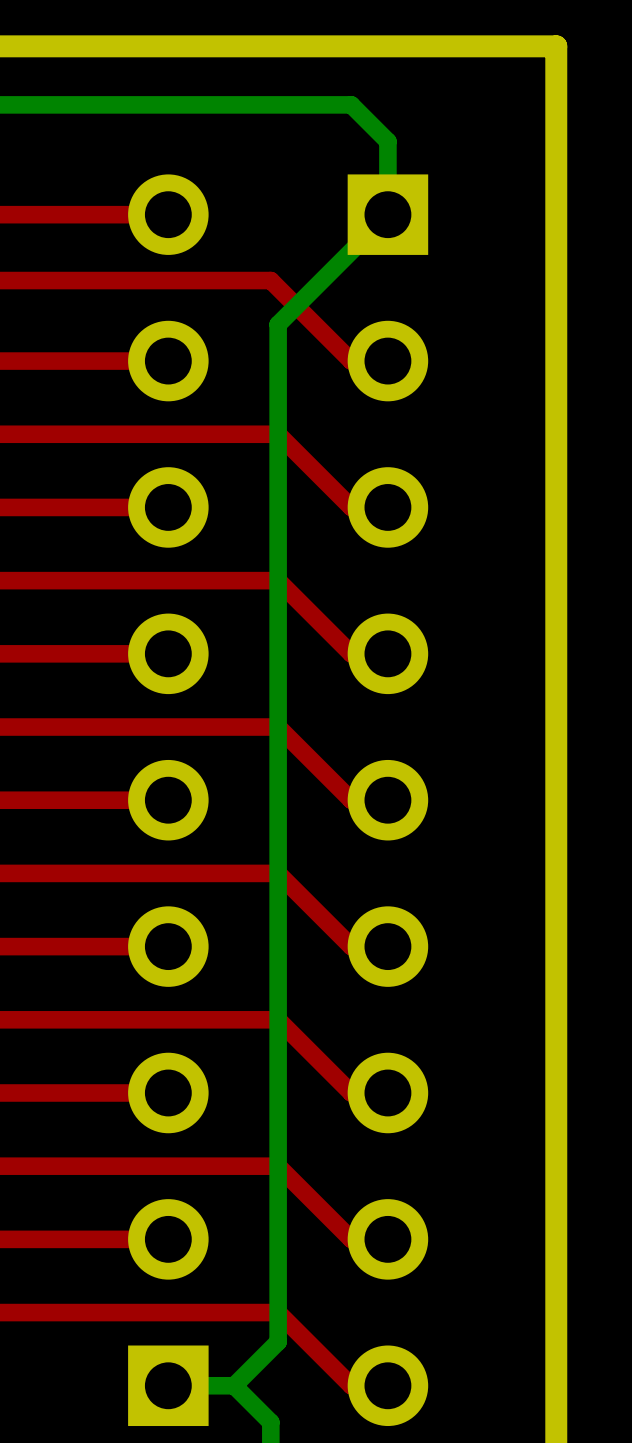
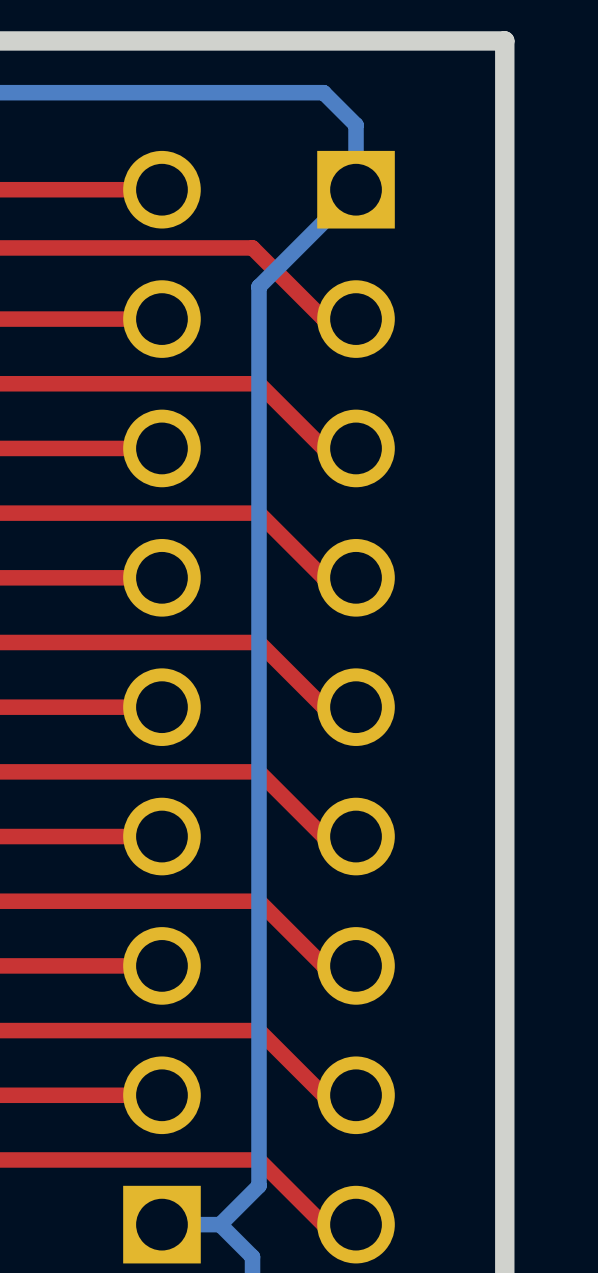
part footprint: [128, 174, 209, 1427] -> [123, 150, 201, 1264]
part footprint: [347, 174, 429, 1427] -> [317, 150, 395, 1264]

